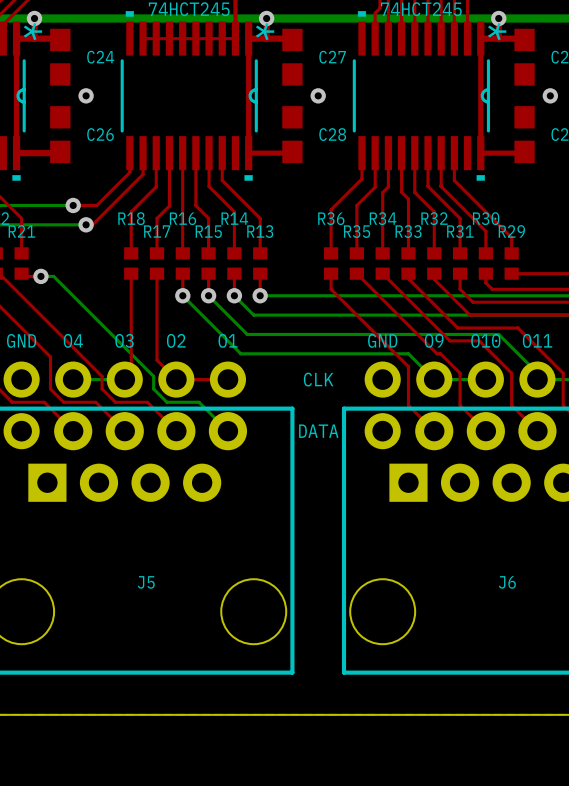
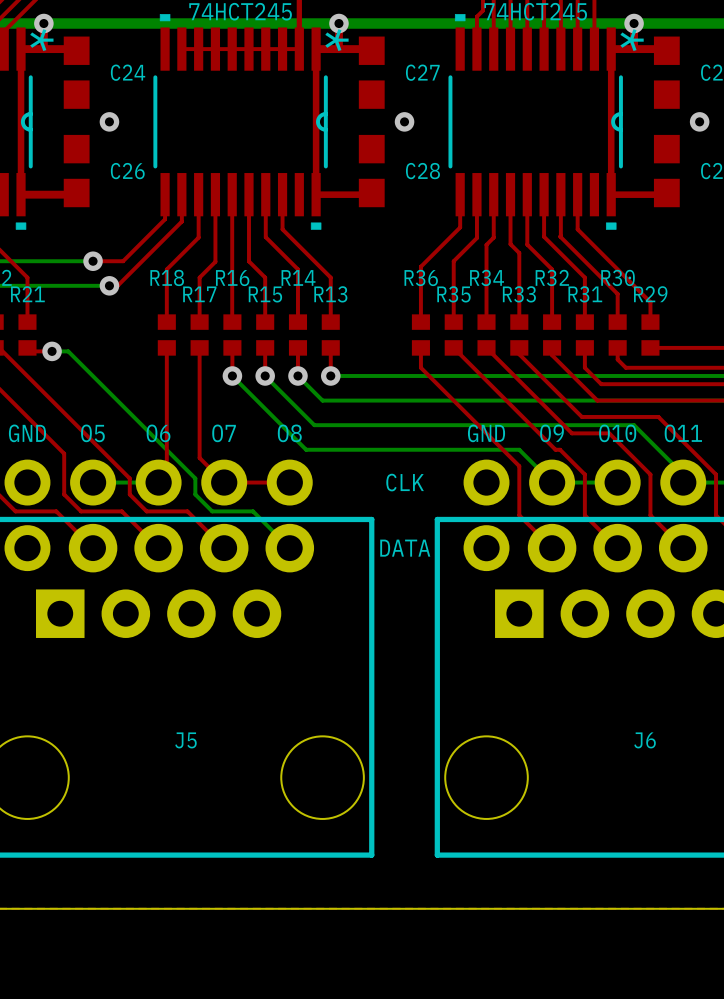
text: O4 (73, 340) -> O5 (92, 433)
text: O3 (124, 340) -> O6 (158, 433)
text: O2 (176, 340) -> O7 (224, 433)
text: O1 (228, 340) -> O8 (289, 433)

